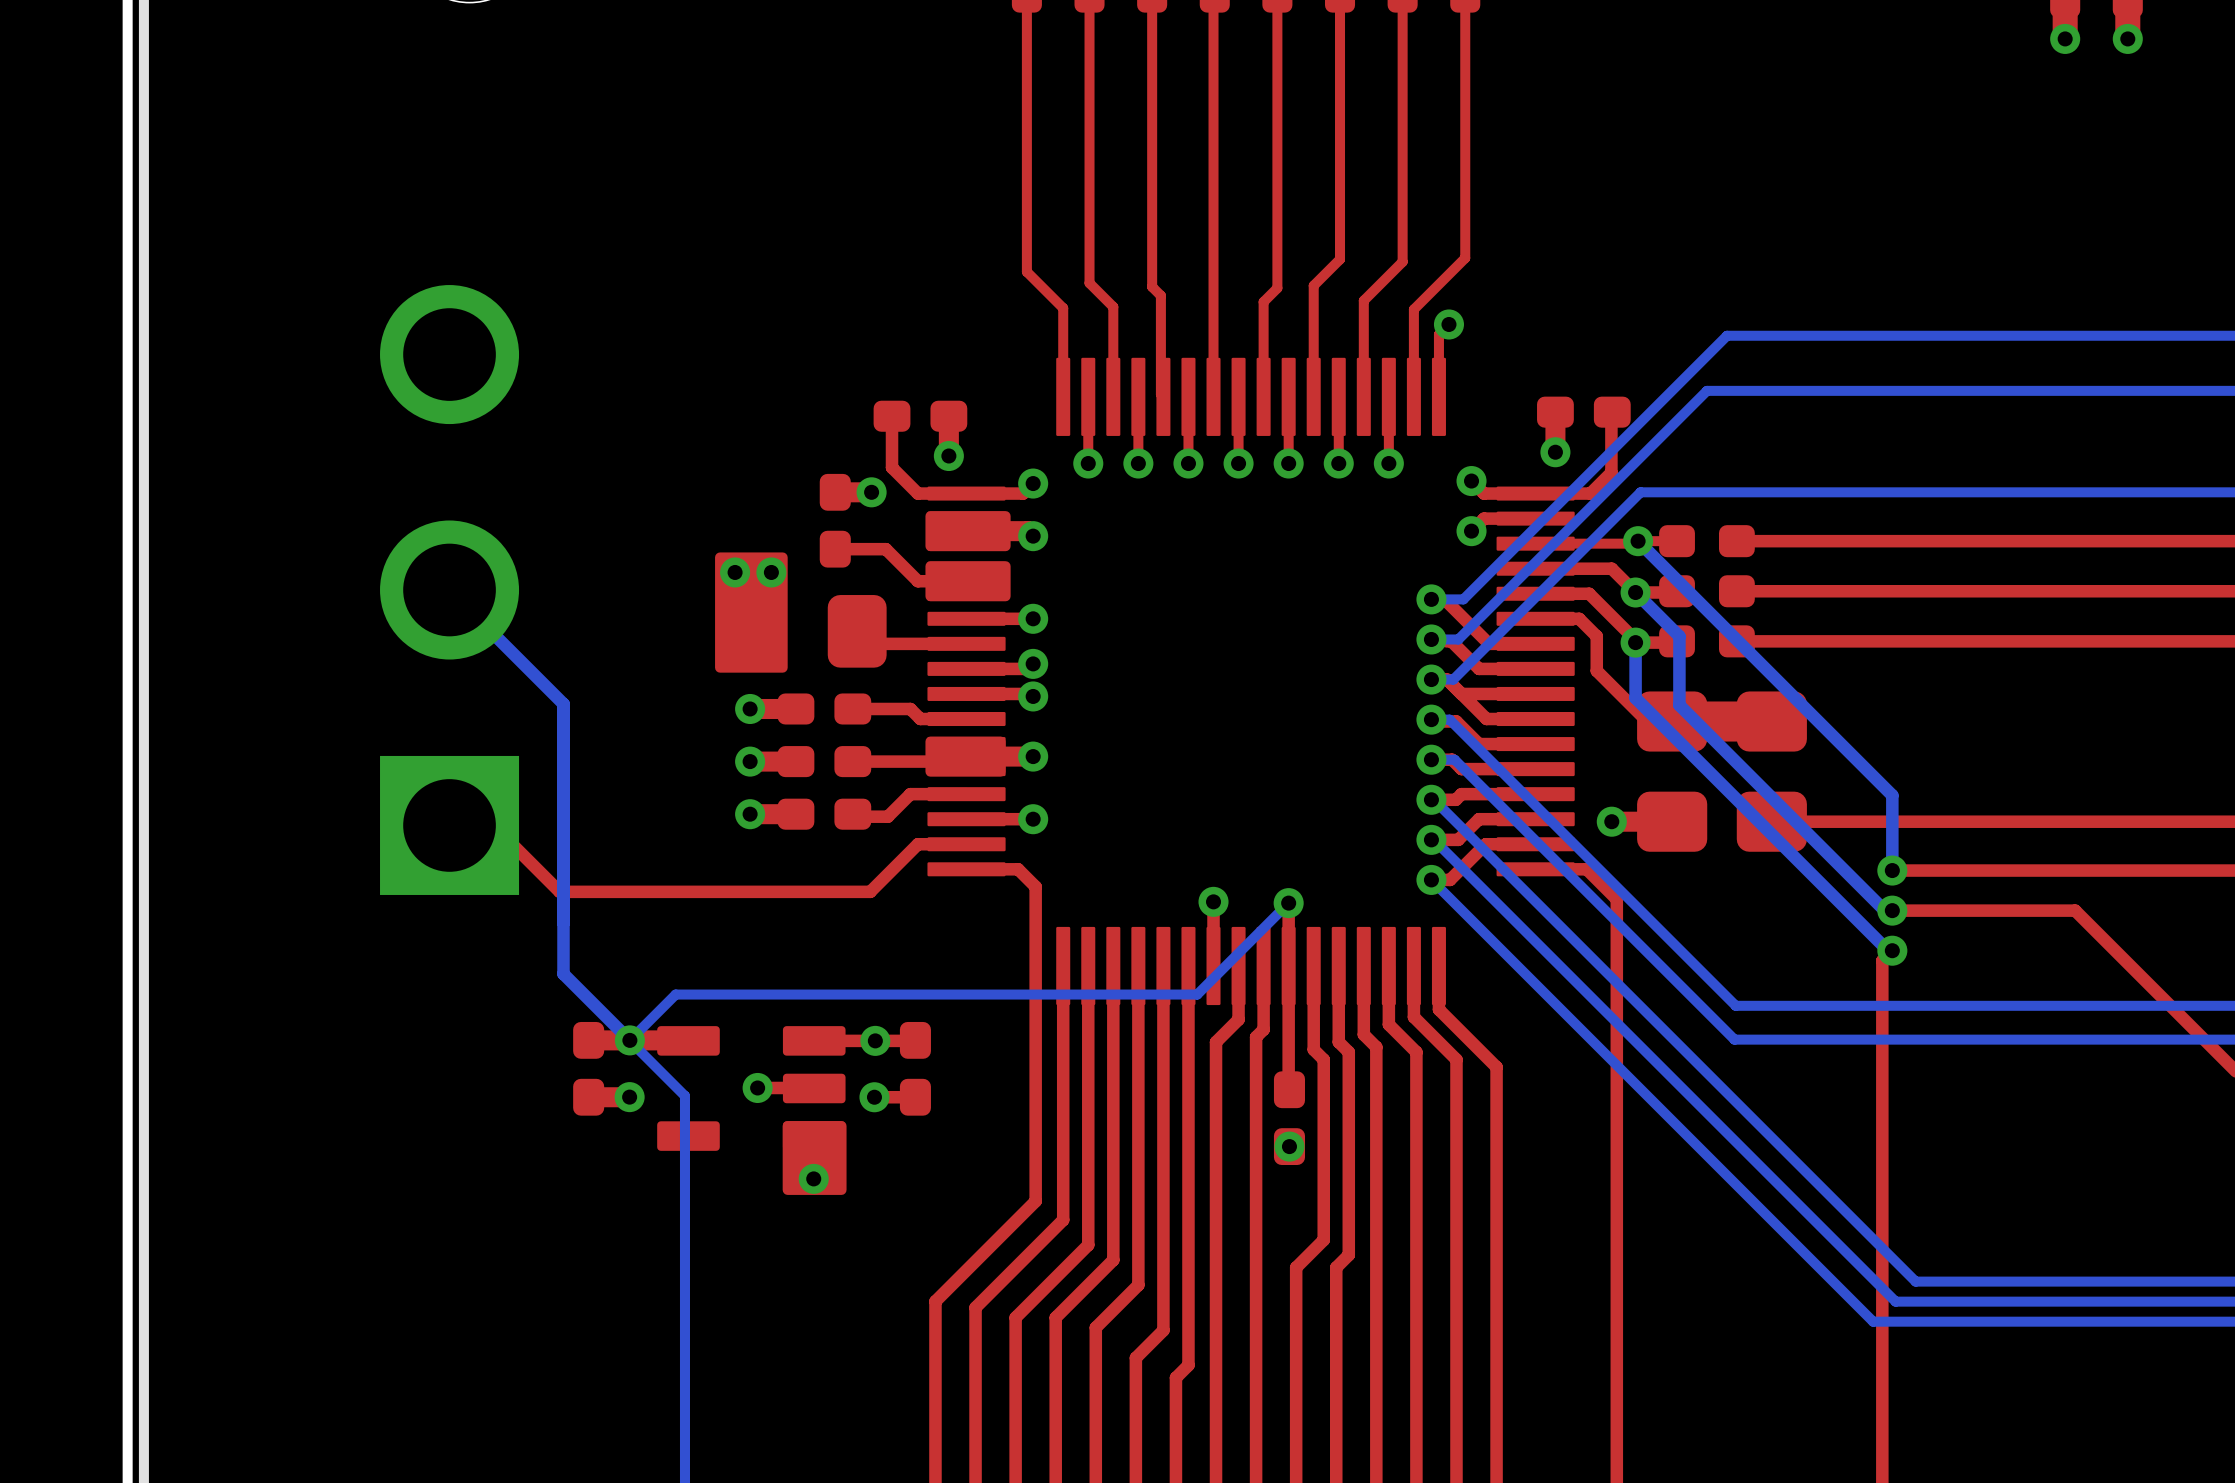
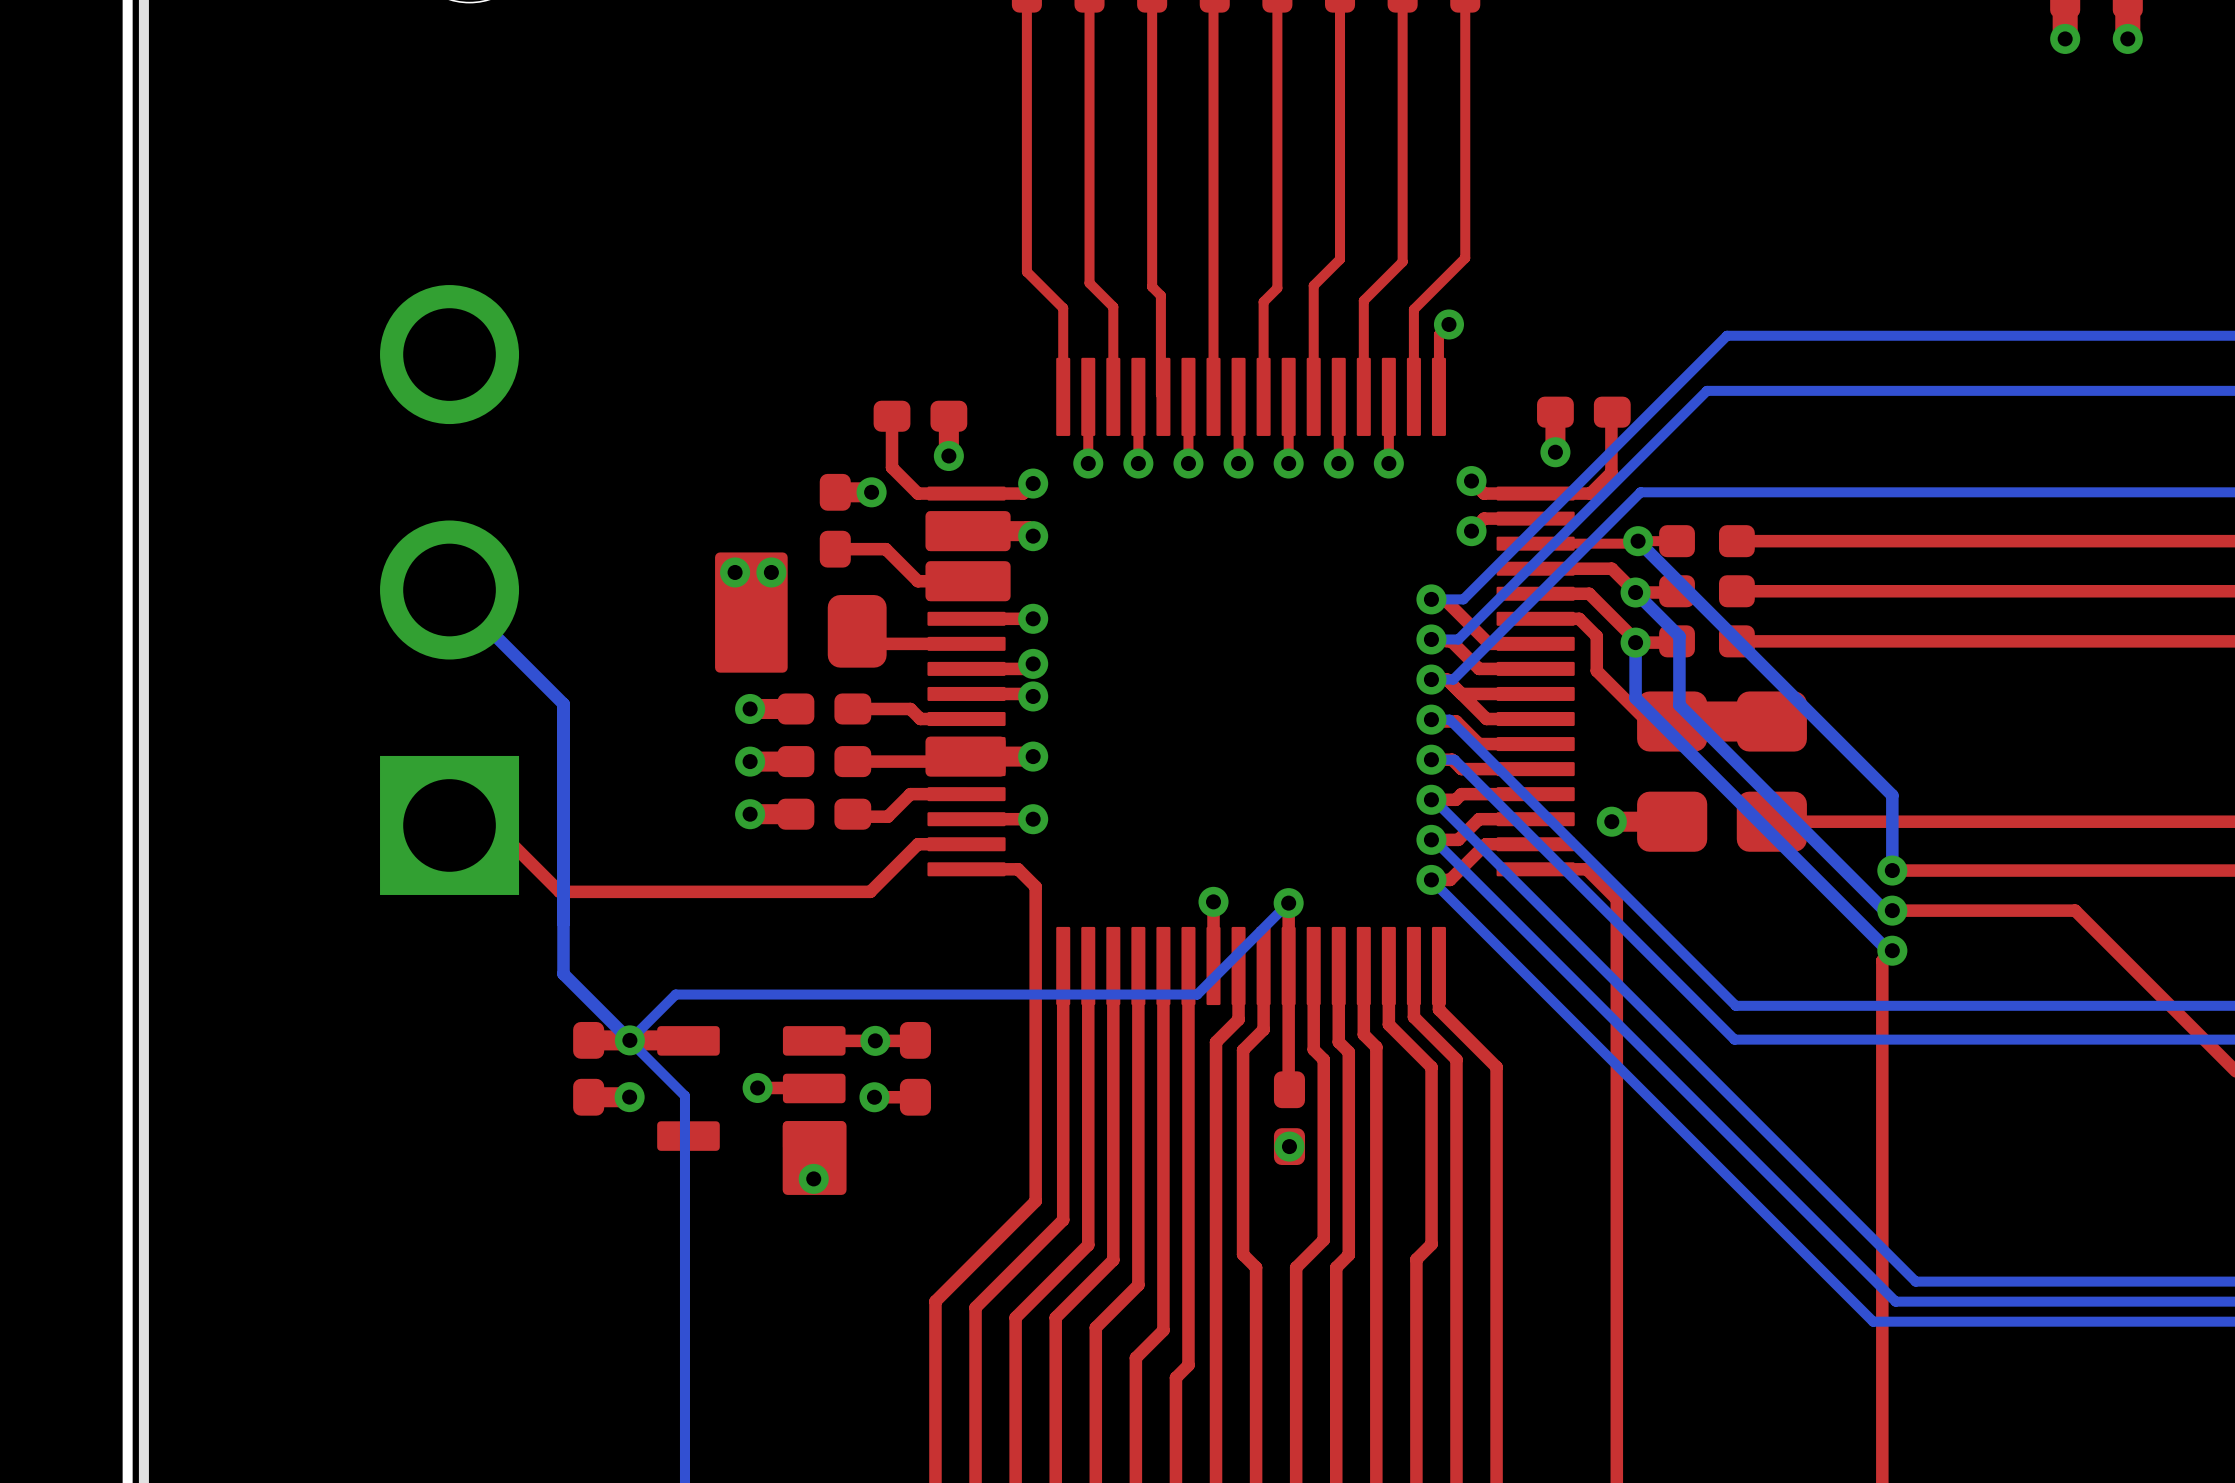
top track: (1256, 1037) (1256, 1267) -> (1256, 1037) (1243, 1050) (1243, 1254) (1256, 1267)
top track: (1416, 1052) (1416, 1259) -> (1416, 1052) (1431, 1067) (1431, 1244) (1416, 1259)

